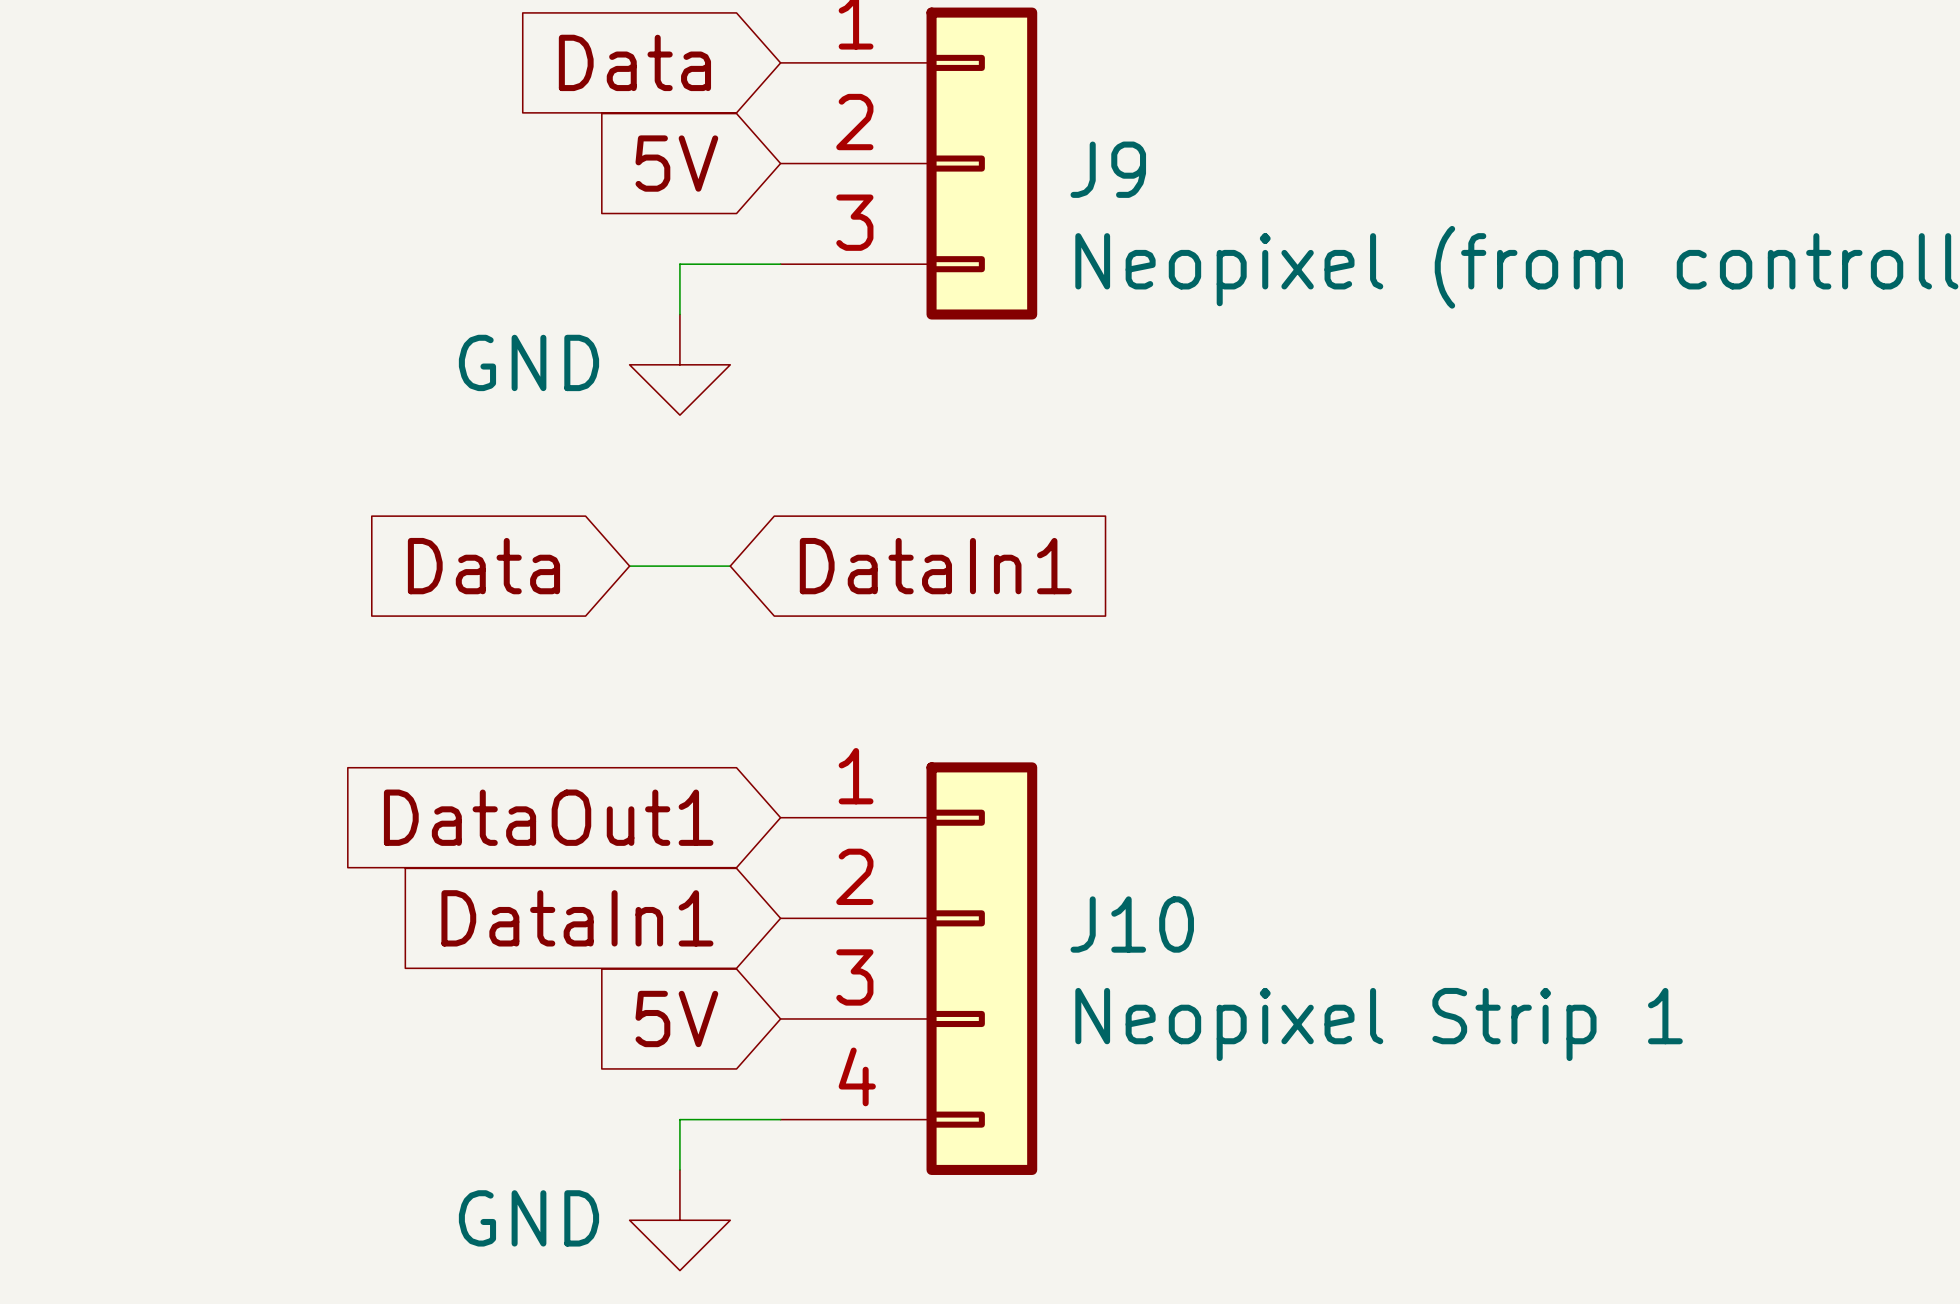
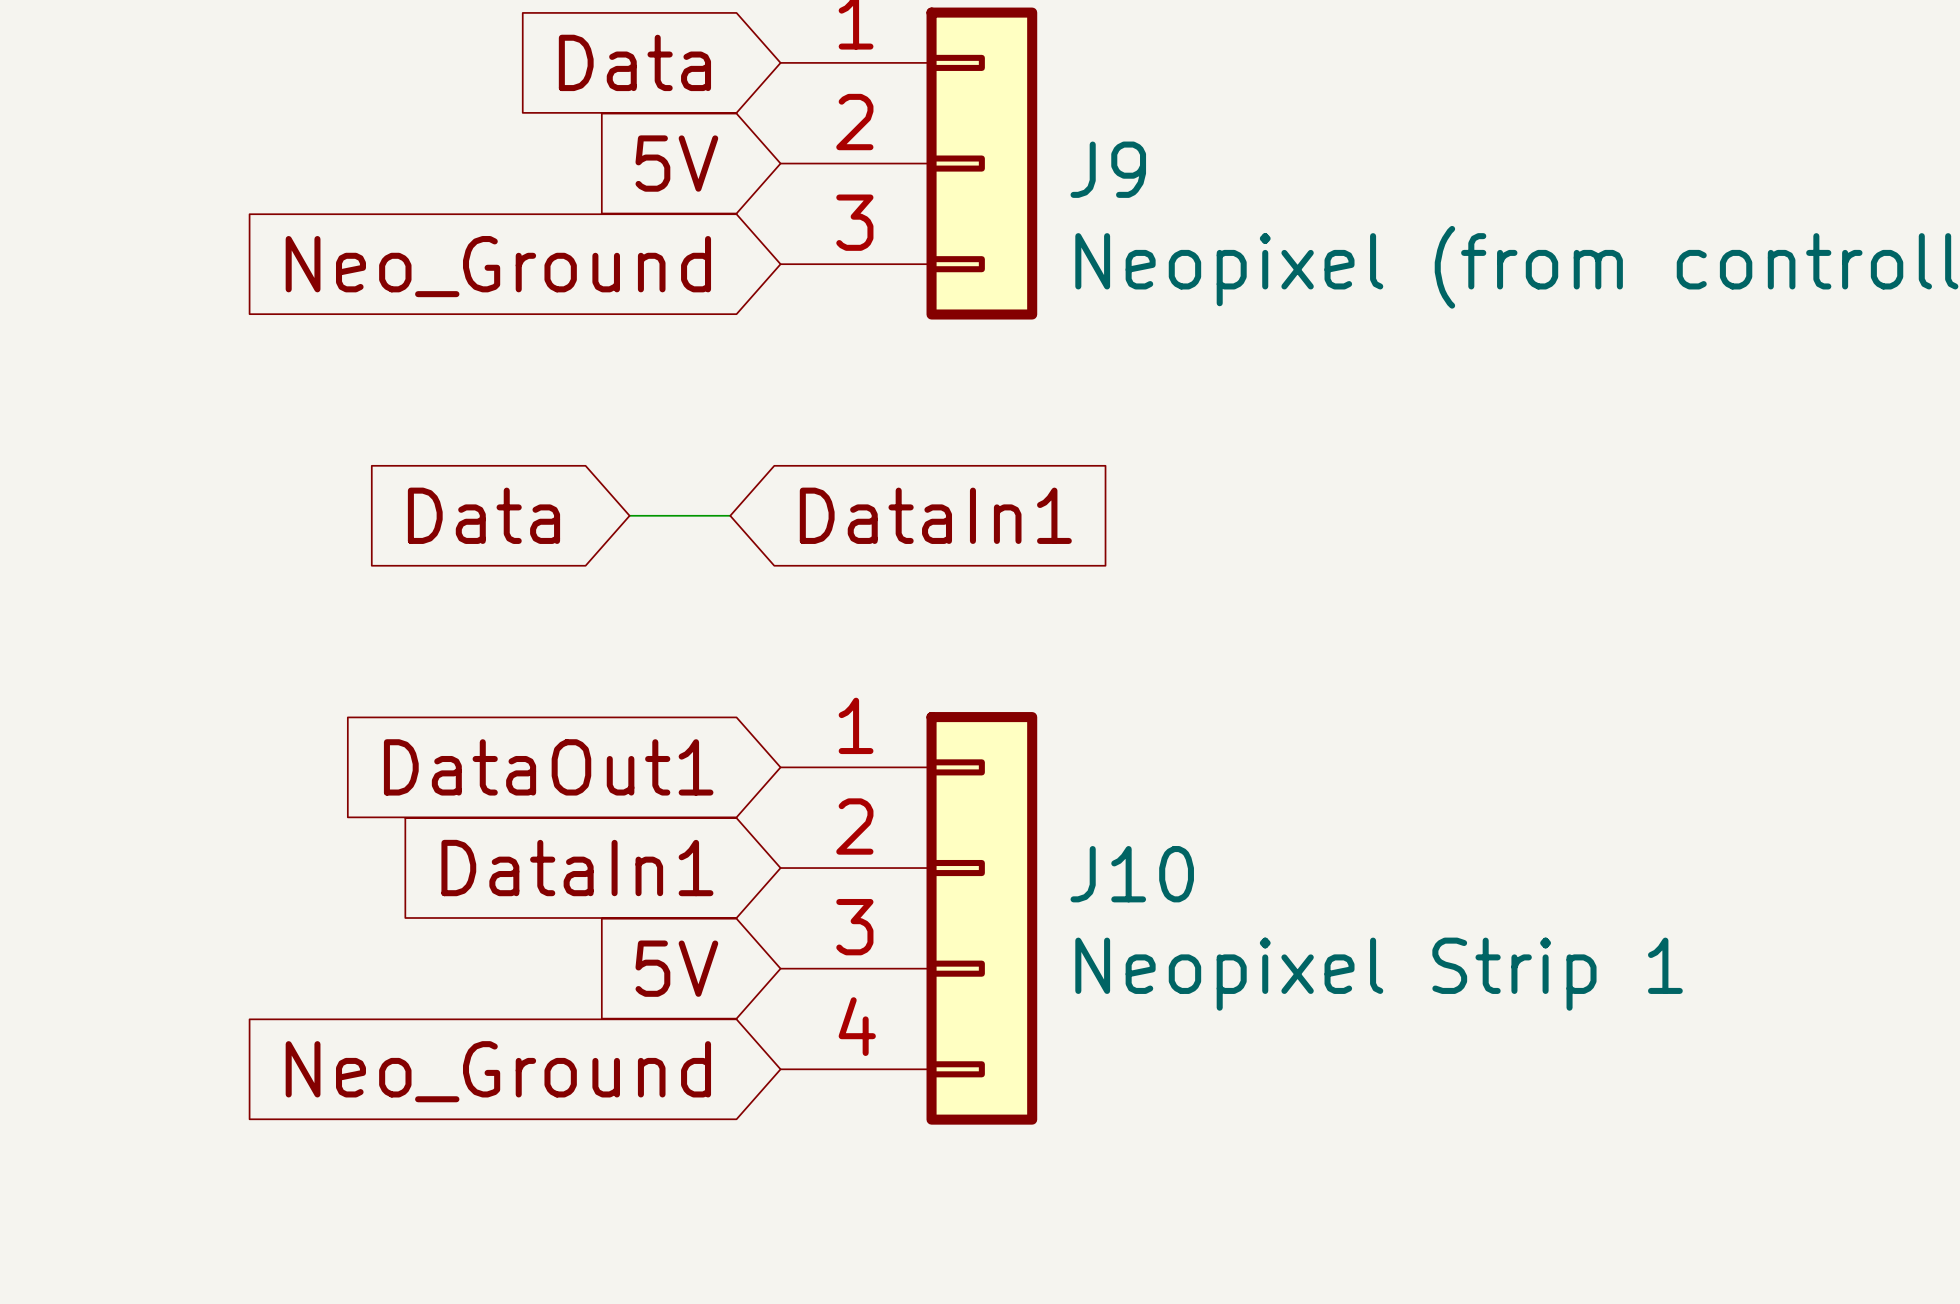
wire: (780, 264) (679, 264) (679, 314) -> none
global label: none -> Neo_Ground (498, 266)
power symbol: GND (679, 364) -> none
global label position: Data (483, 566) -> Data (483, 515)
wire: (629, 566) (730, 566) -> (629, 515) (730, 515)
global label position: DataIn1 (935, 566) -> DataIn1 (935, 515)
global label position: DataOut1 (548, 817) -> DataOut1 (548, 767)
global label position: DataIn1 (577, 918) -> DataIn1 (577, 868)
J10 position: (908, 968) -> (908, 918)
global label position: 5V (676, 1018) -> 5V (676, 968)
global label: none -> Neo_Ground (498, 1071)
wire: (780, 1119) (679, 1119) (679, 1169) -> none
power symbol: GND (679, 1220) -> none

